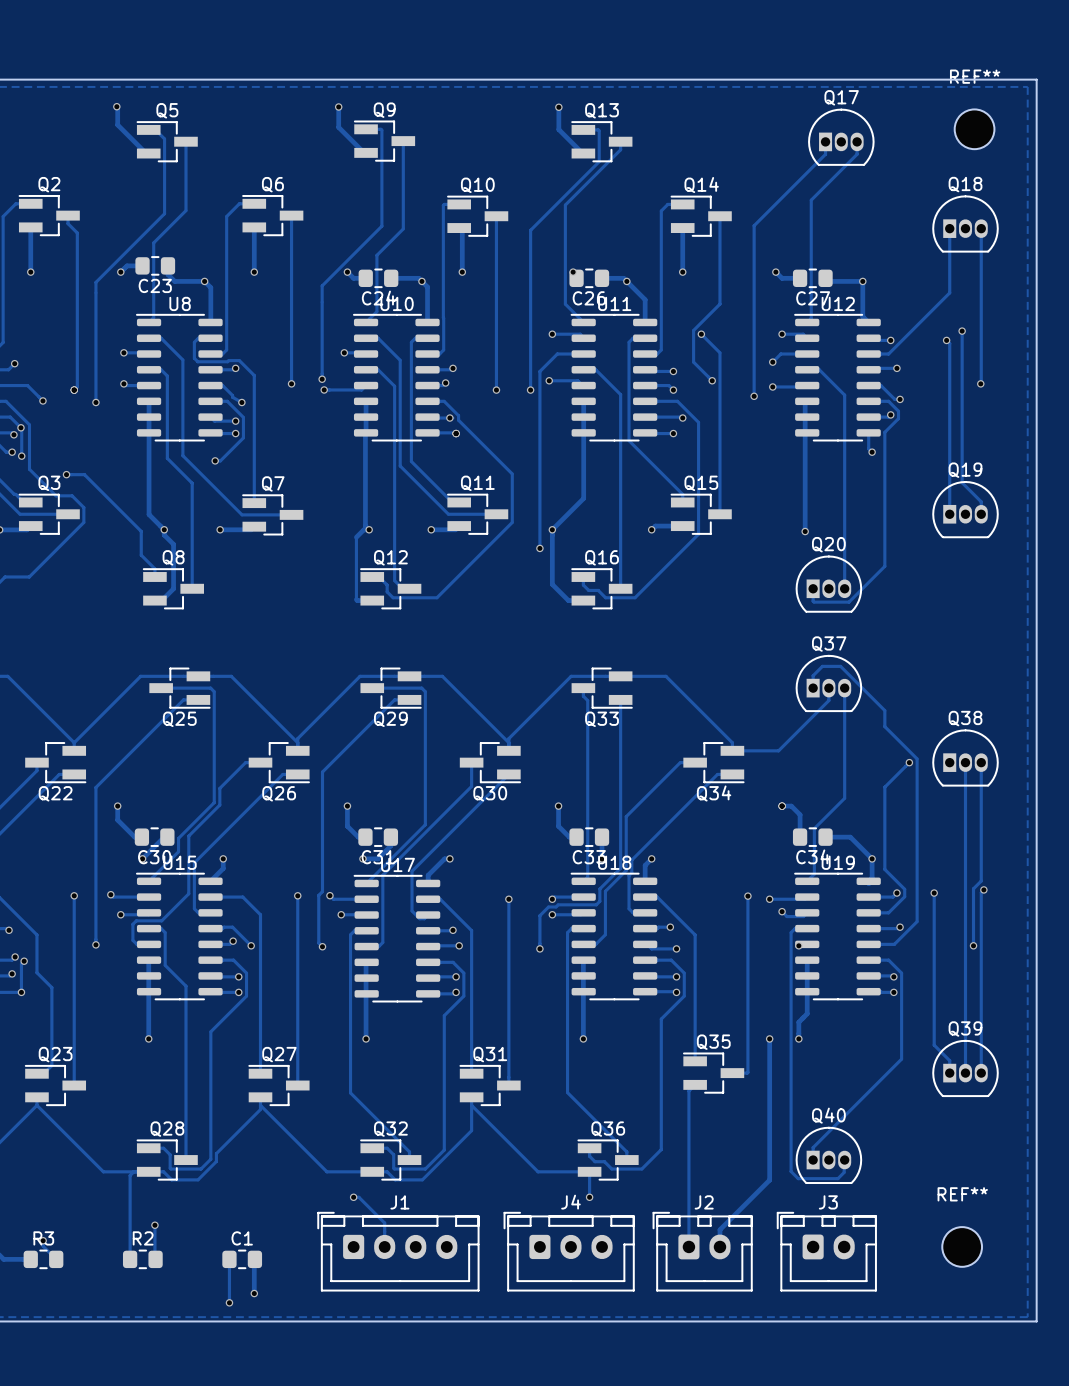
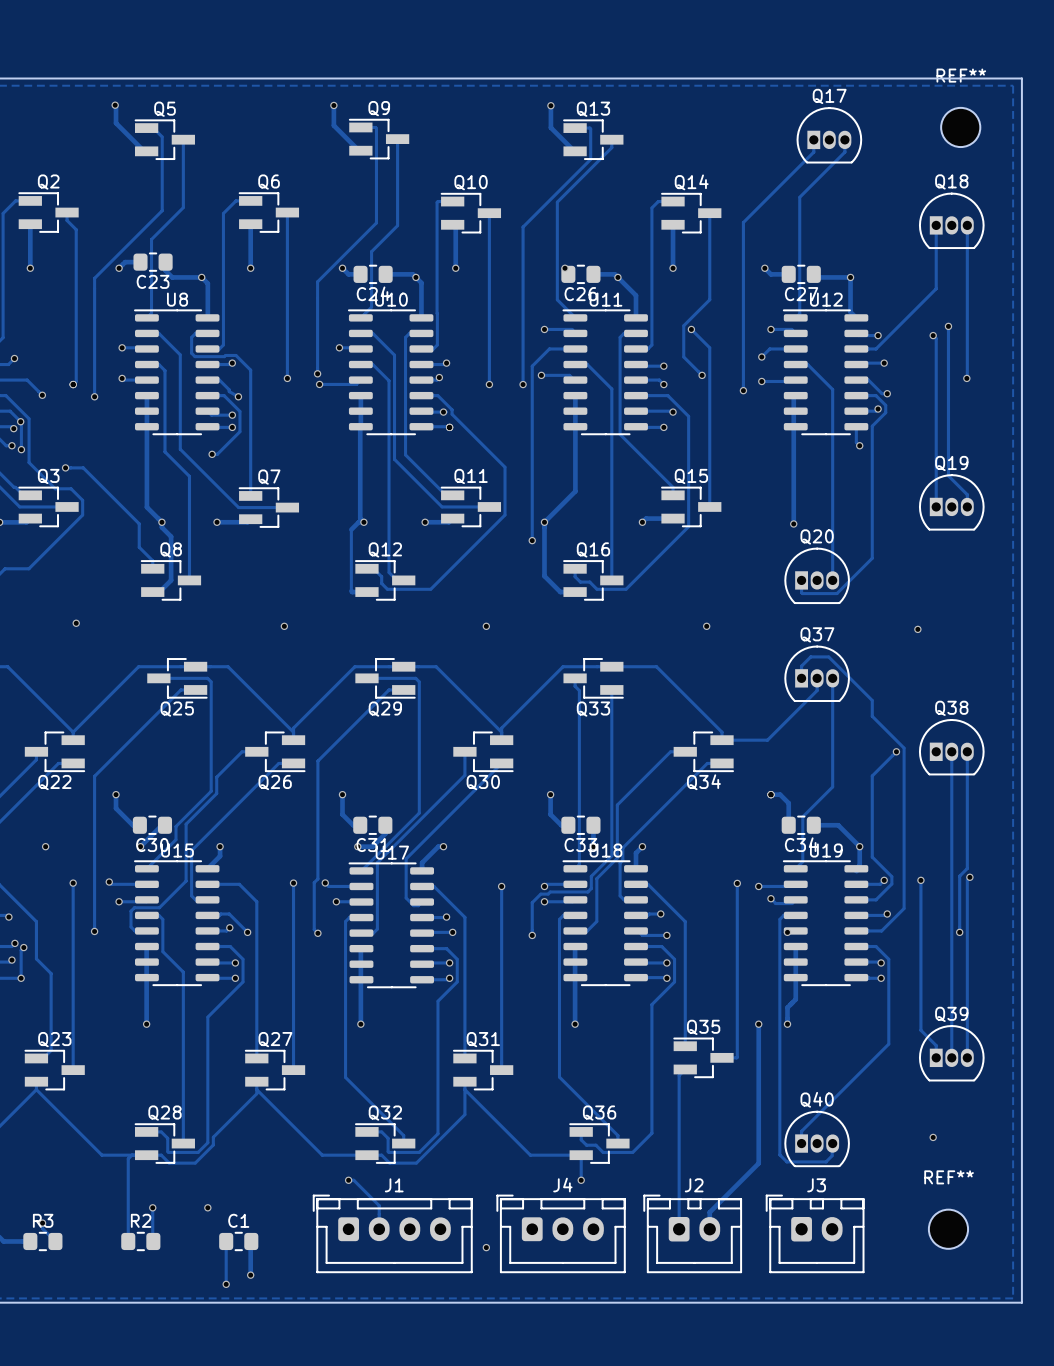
via: none -> (76, 623)
via: none -> (284, 626)
via: none -> (486, 626)
via: none -> (706, 626)
via: none -> (917, 629)
via: none -> (45, 846)
via: none -> (933, 1137)
via: none -> (207, 1207)
via: none -> (486, 1247)

